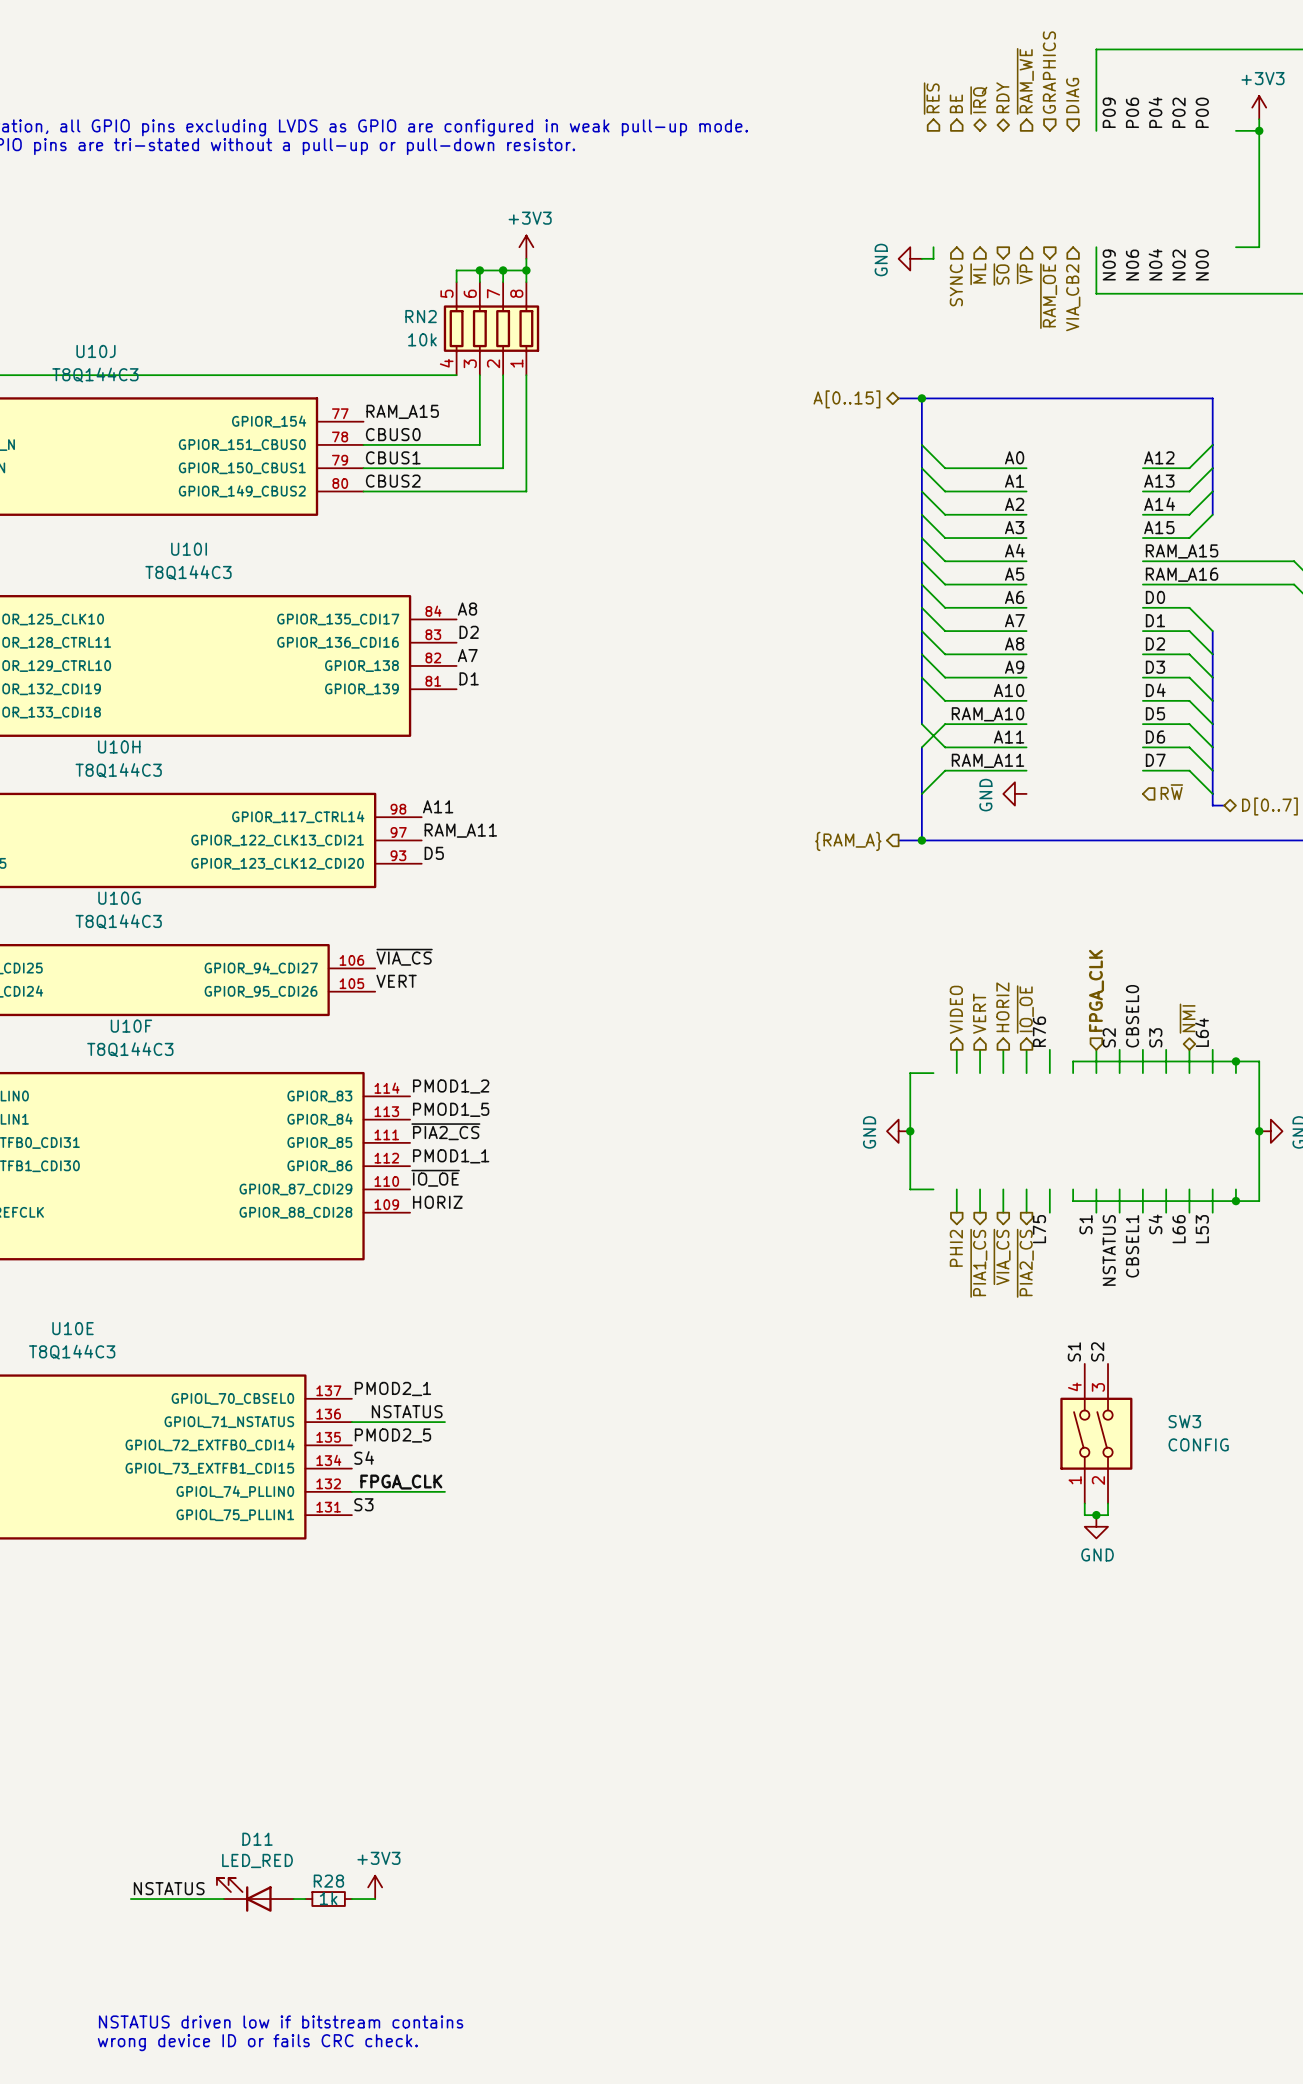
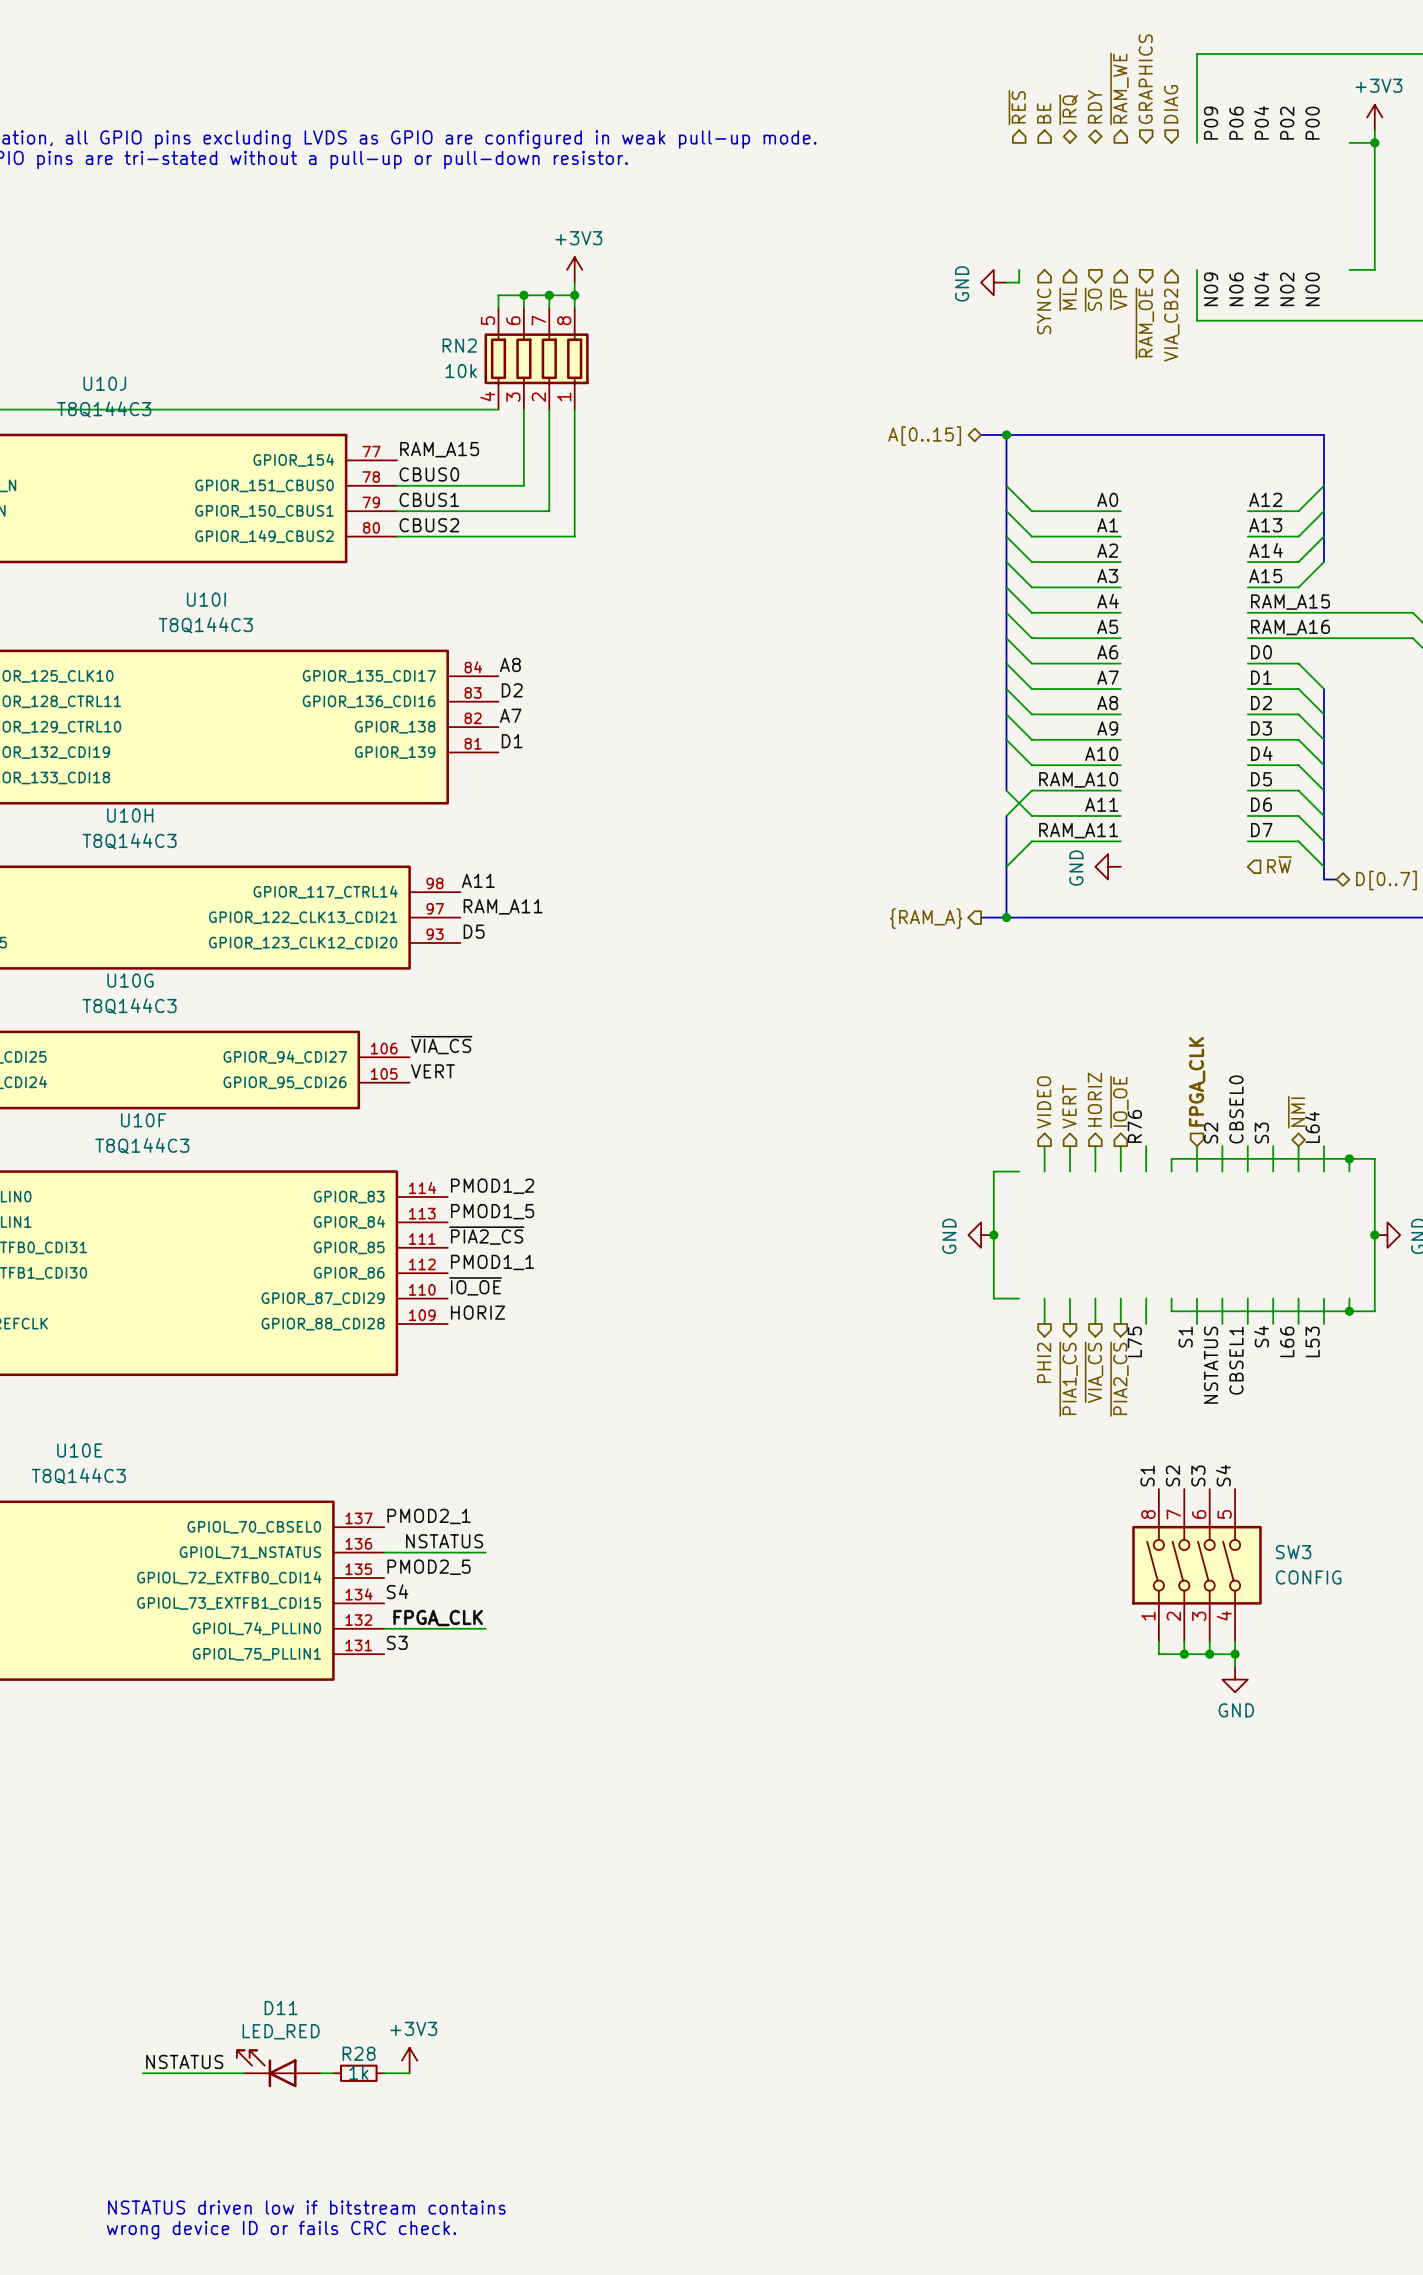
label: none -> S1 (1147, 1475)
label: S1 (1074, 1351) -> S2 (1172, 1475)
label: S2 (1097, 1351) -> S3 (1198, 1475)
label: none -> S4 (1223, 1475)
SW3 symbol: [1060, 1363, 1133, 1504] -> [1132, 1489, 1262, 1642]
wire: none -> (1158, 1641) (1158, 1654) (1184, 1654)
wire: none -> (1235, 1641) (1235, 1666)
junction: none -> (1184, 1654)
junction: (1096, 1515) -> none
wire: none -> (1209, 1654) (1235, 1654)
junction: none -> (1209, 1654)
junction: none -> (1235, 1654)
power symbol position: GND (1096, 1526) -> GND (1235, 1679)

